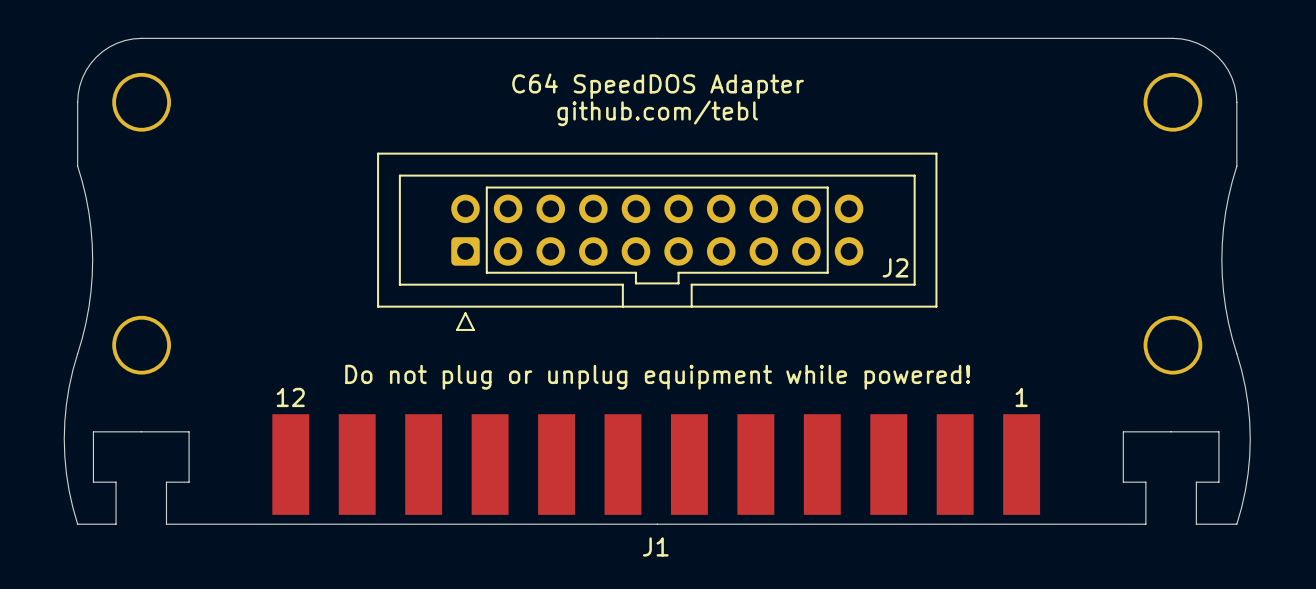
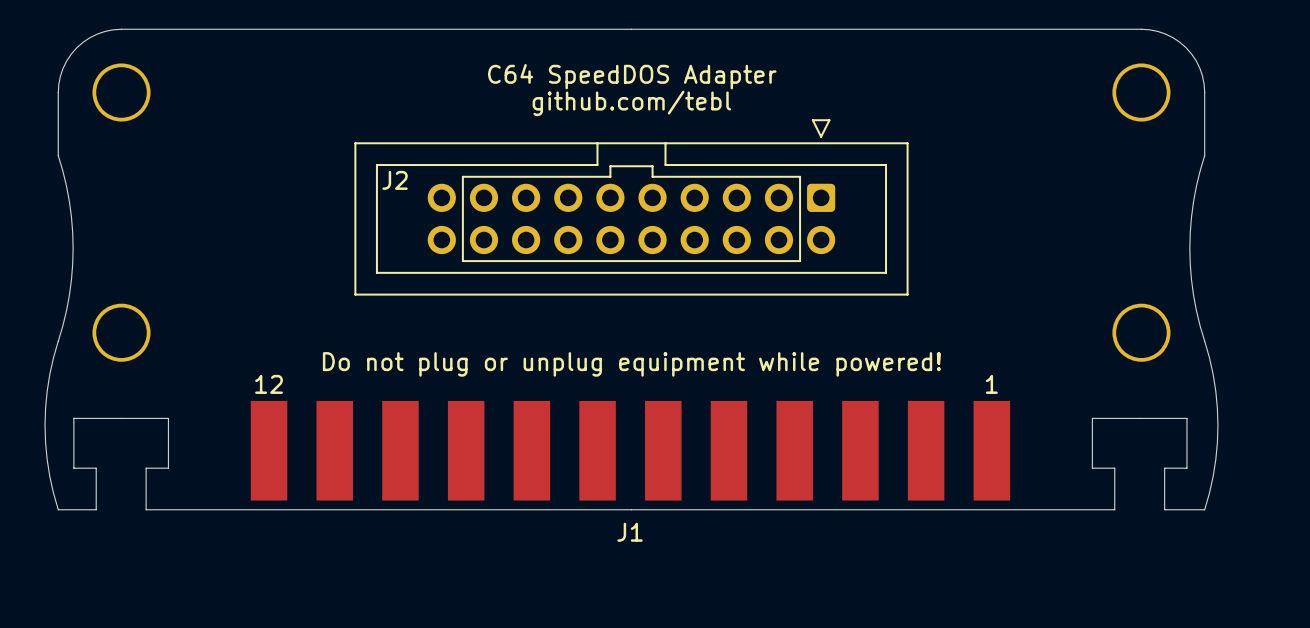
J2 rotation: 0° (657, 241) -> 180° (631, 207)

